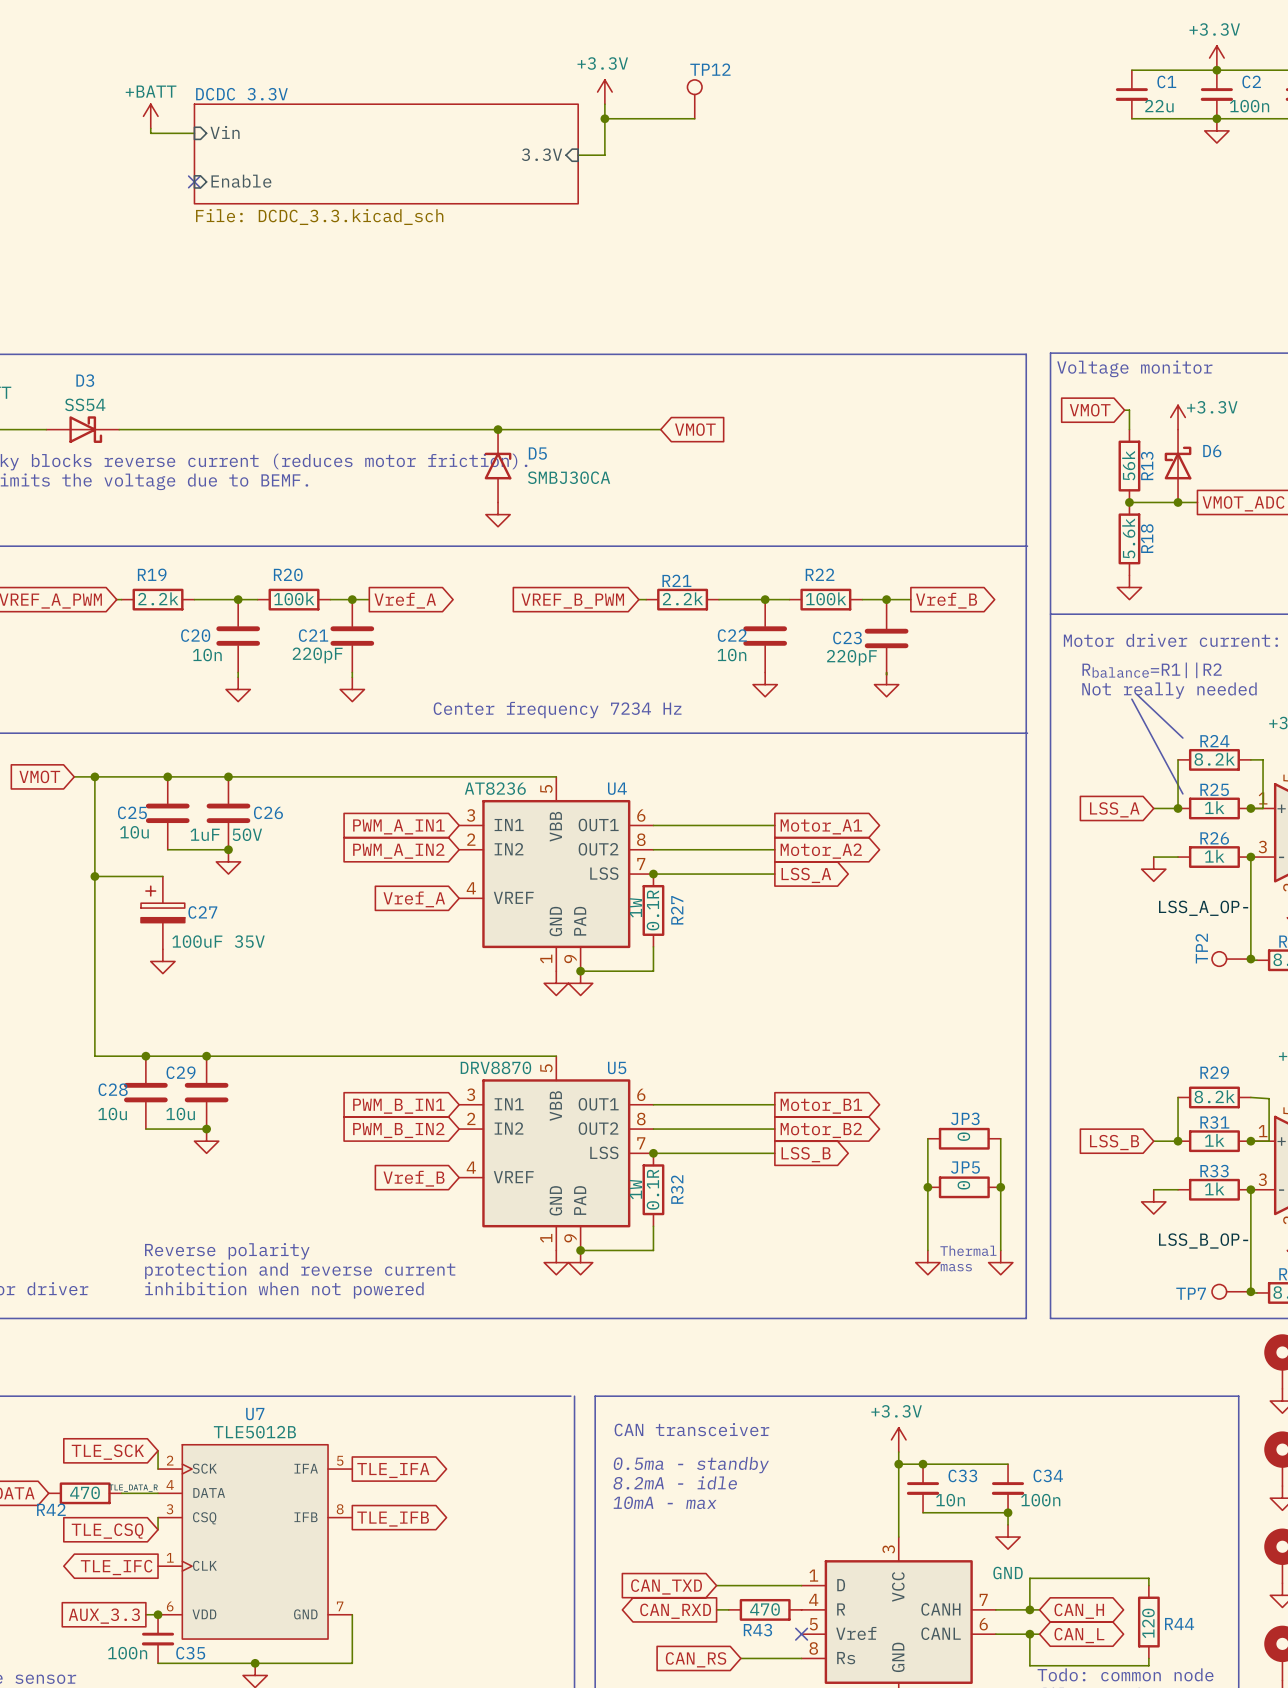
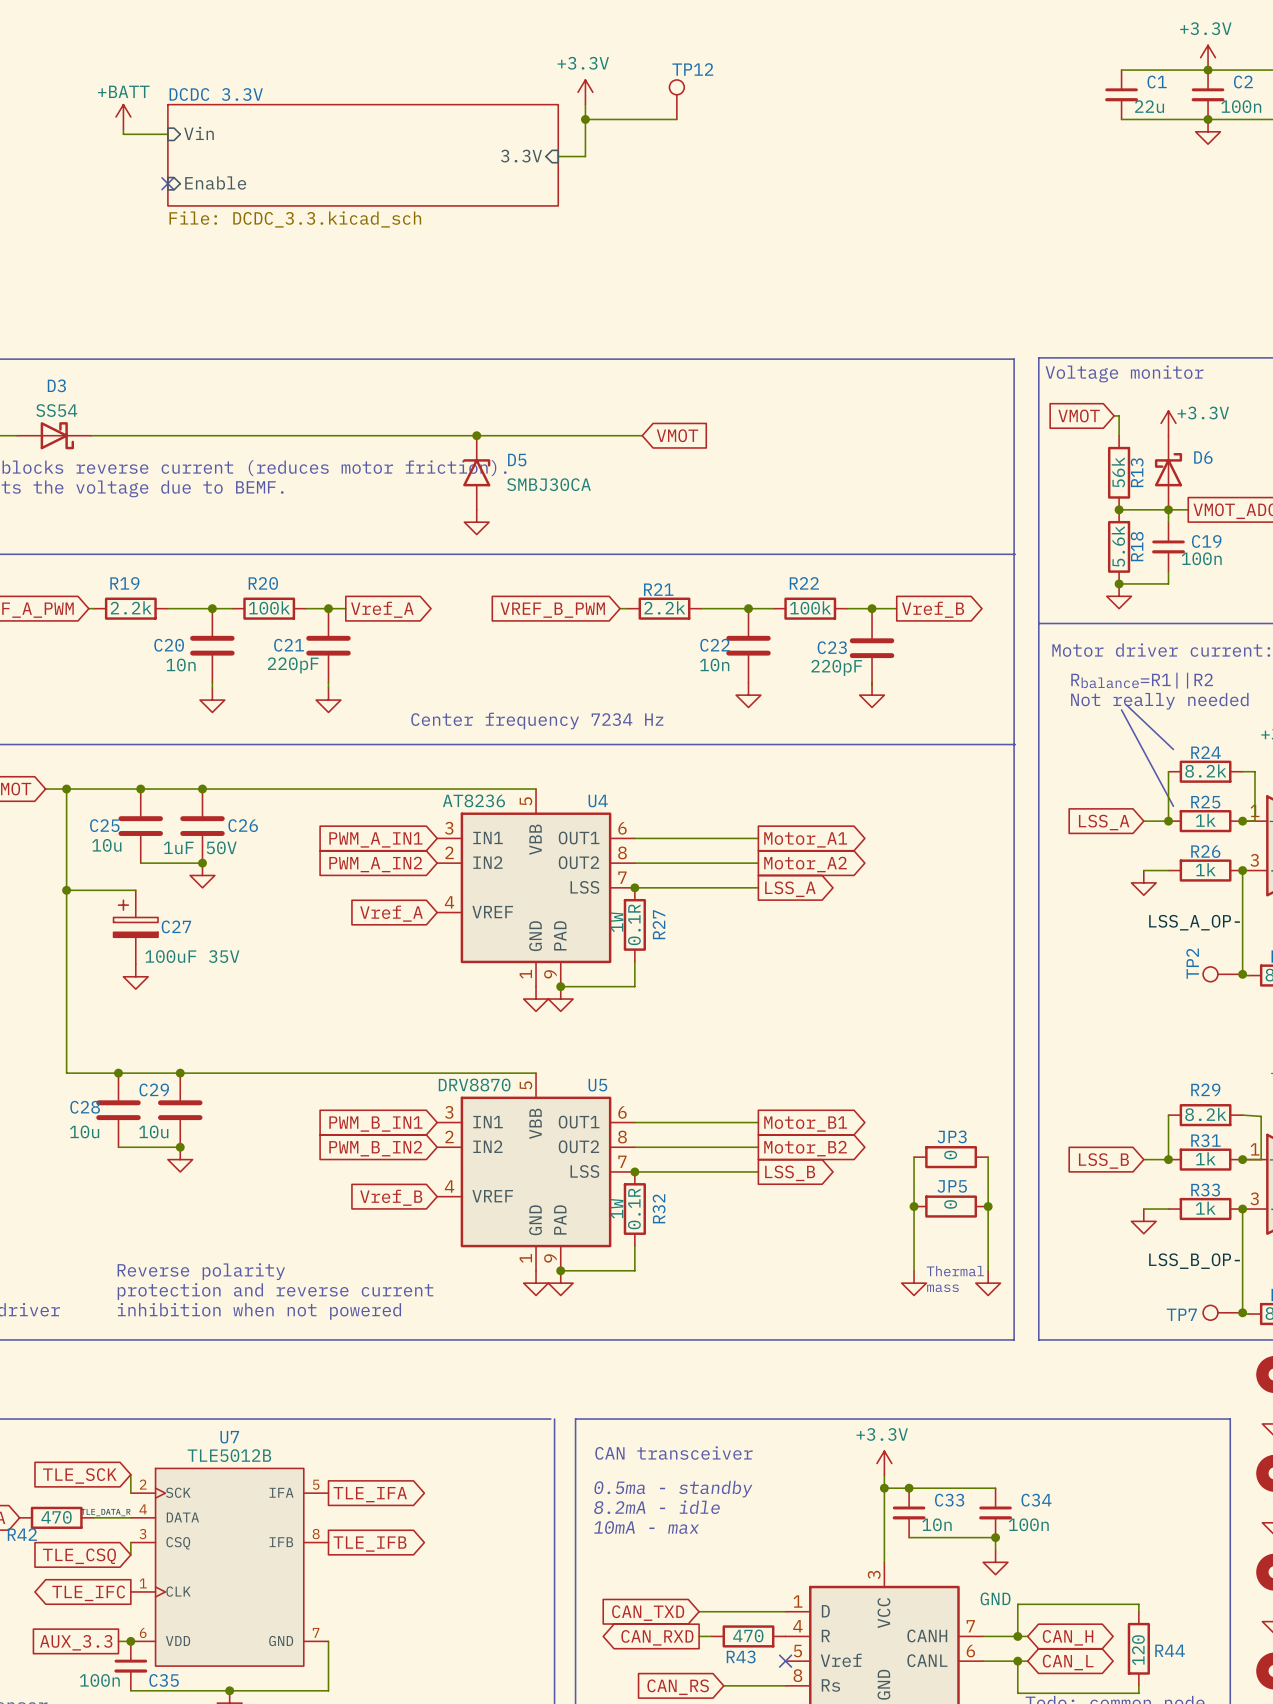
wire: none -> (1168, 509) (1168, 522)
C19: none -> 100n (1168, 546)
wire: none -> (1168, 571) (1168, 583) (1119, 583)
junction: none -> (1119, 583)

